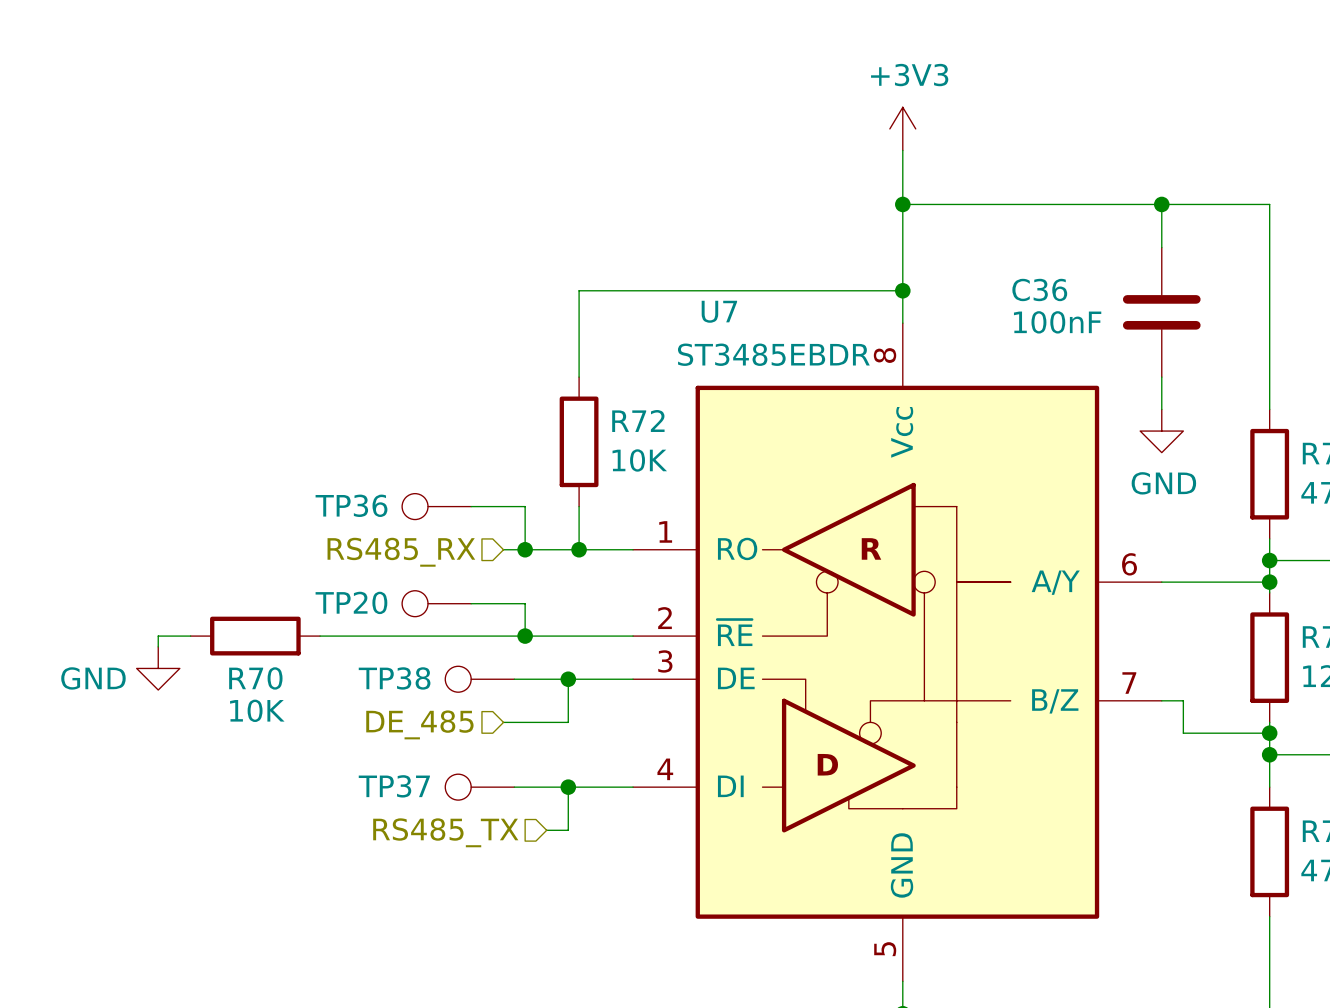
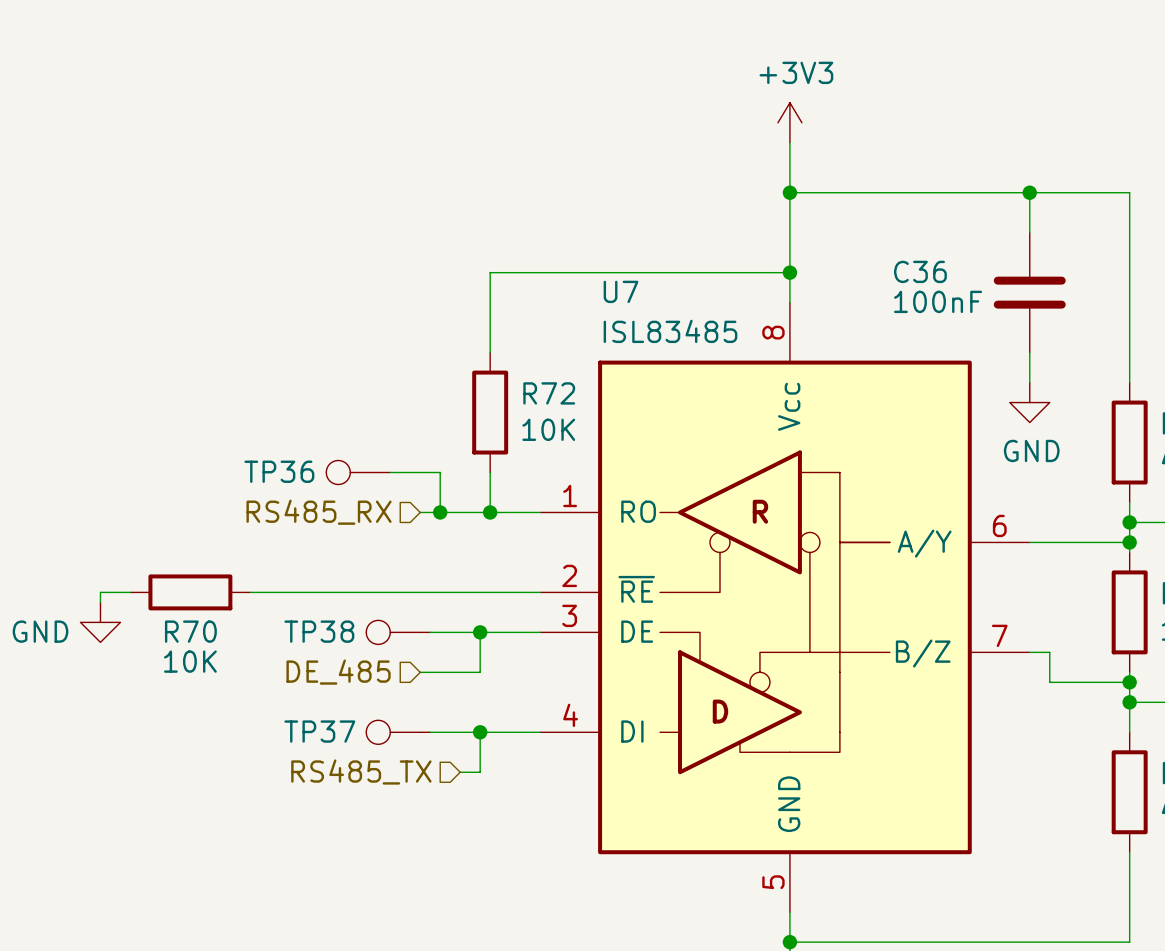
U7 value: ST3485EBDR (773, 354) -> ISL83485 (670, 331)
TP20: (436, 603) -> none
wire: (471, 603) (525, 603) (525, 636) -> none
junction: (525, 636) -> none

